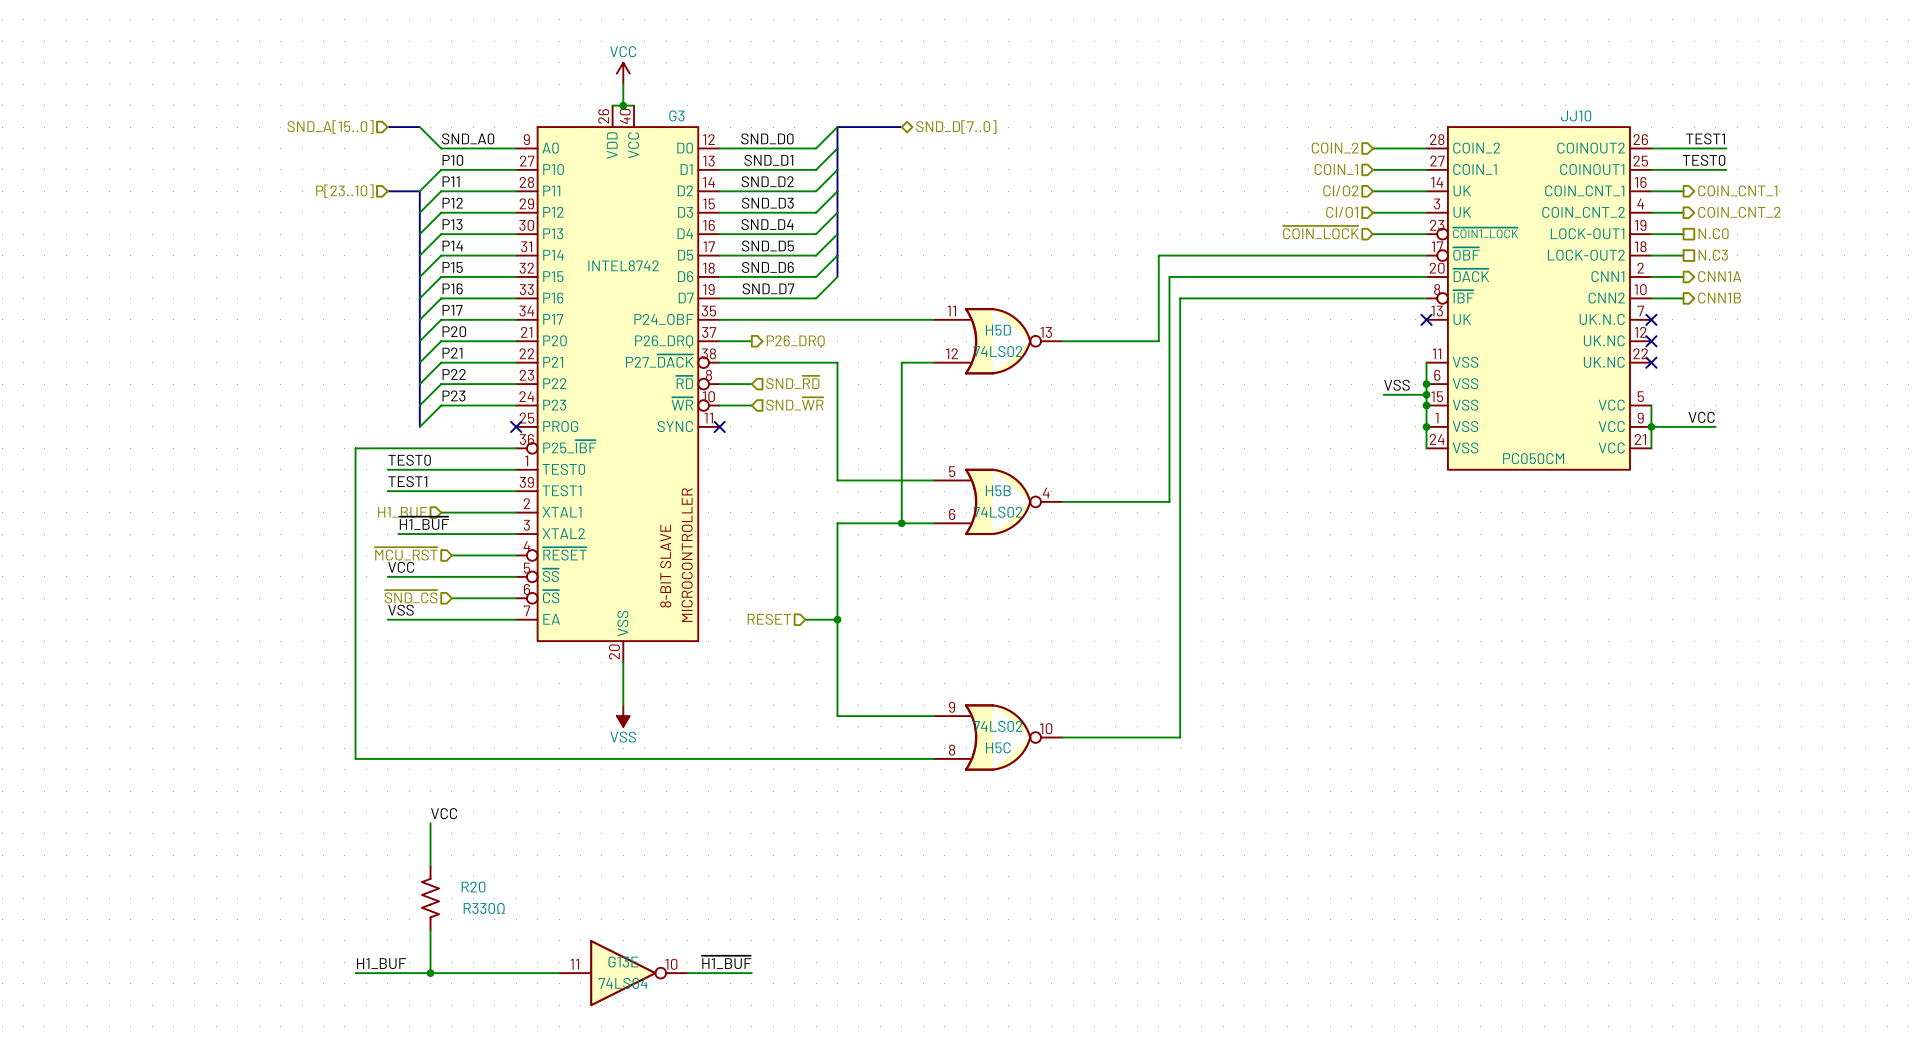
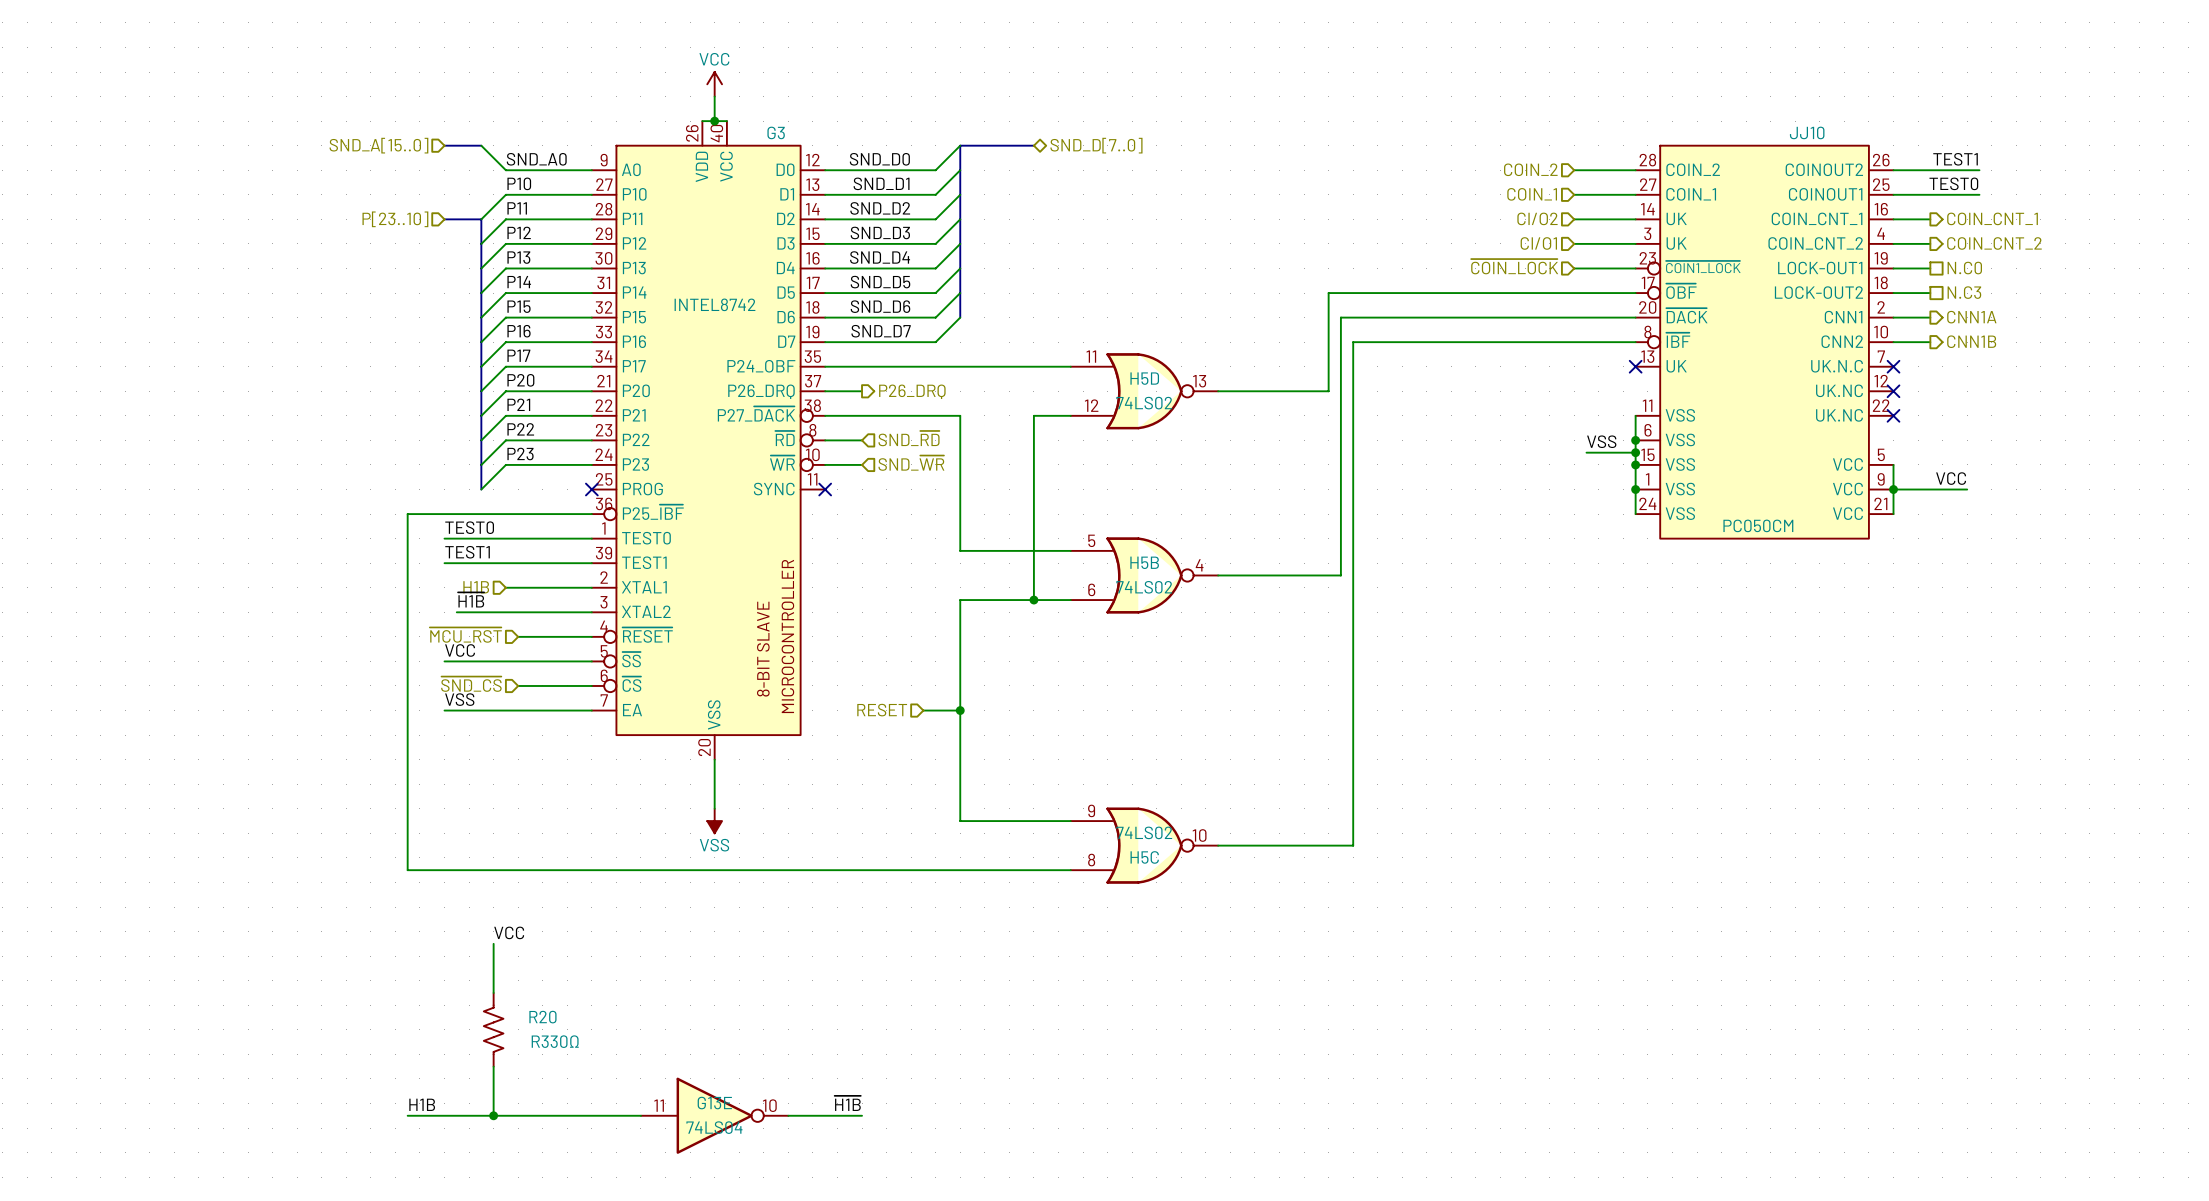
hierarchical label: H1_BUF (402, 512) -> H1B (476, 587)
label: ~{H1_BUF} (424, 523) -> ~{H1B} (471, 599)
label: ~{H1_BUF} (726, 962) -> ~{H1B} (847, 1103)
label: H1_BUF (381, 963) -> H1B (422, 1104)

